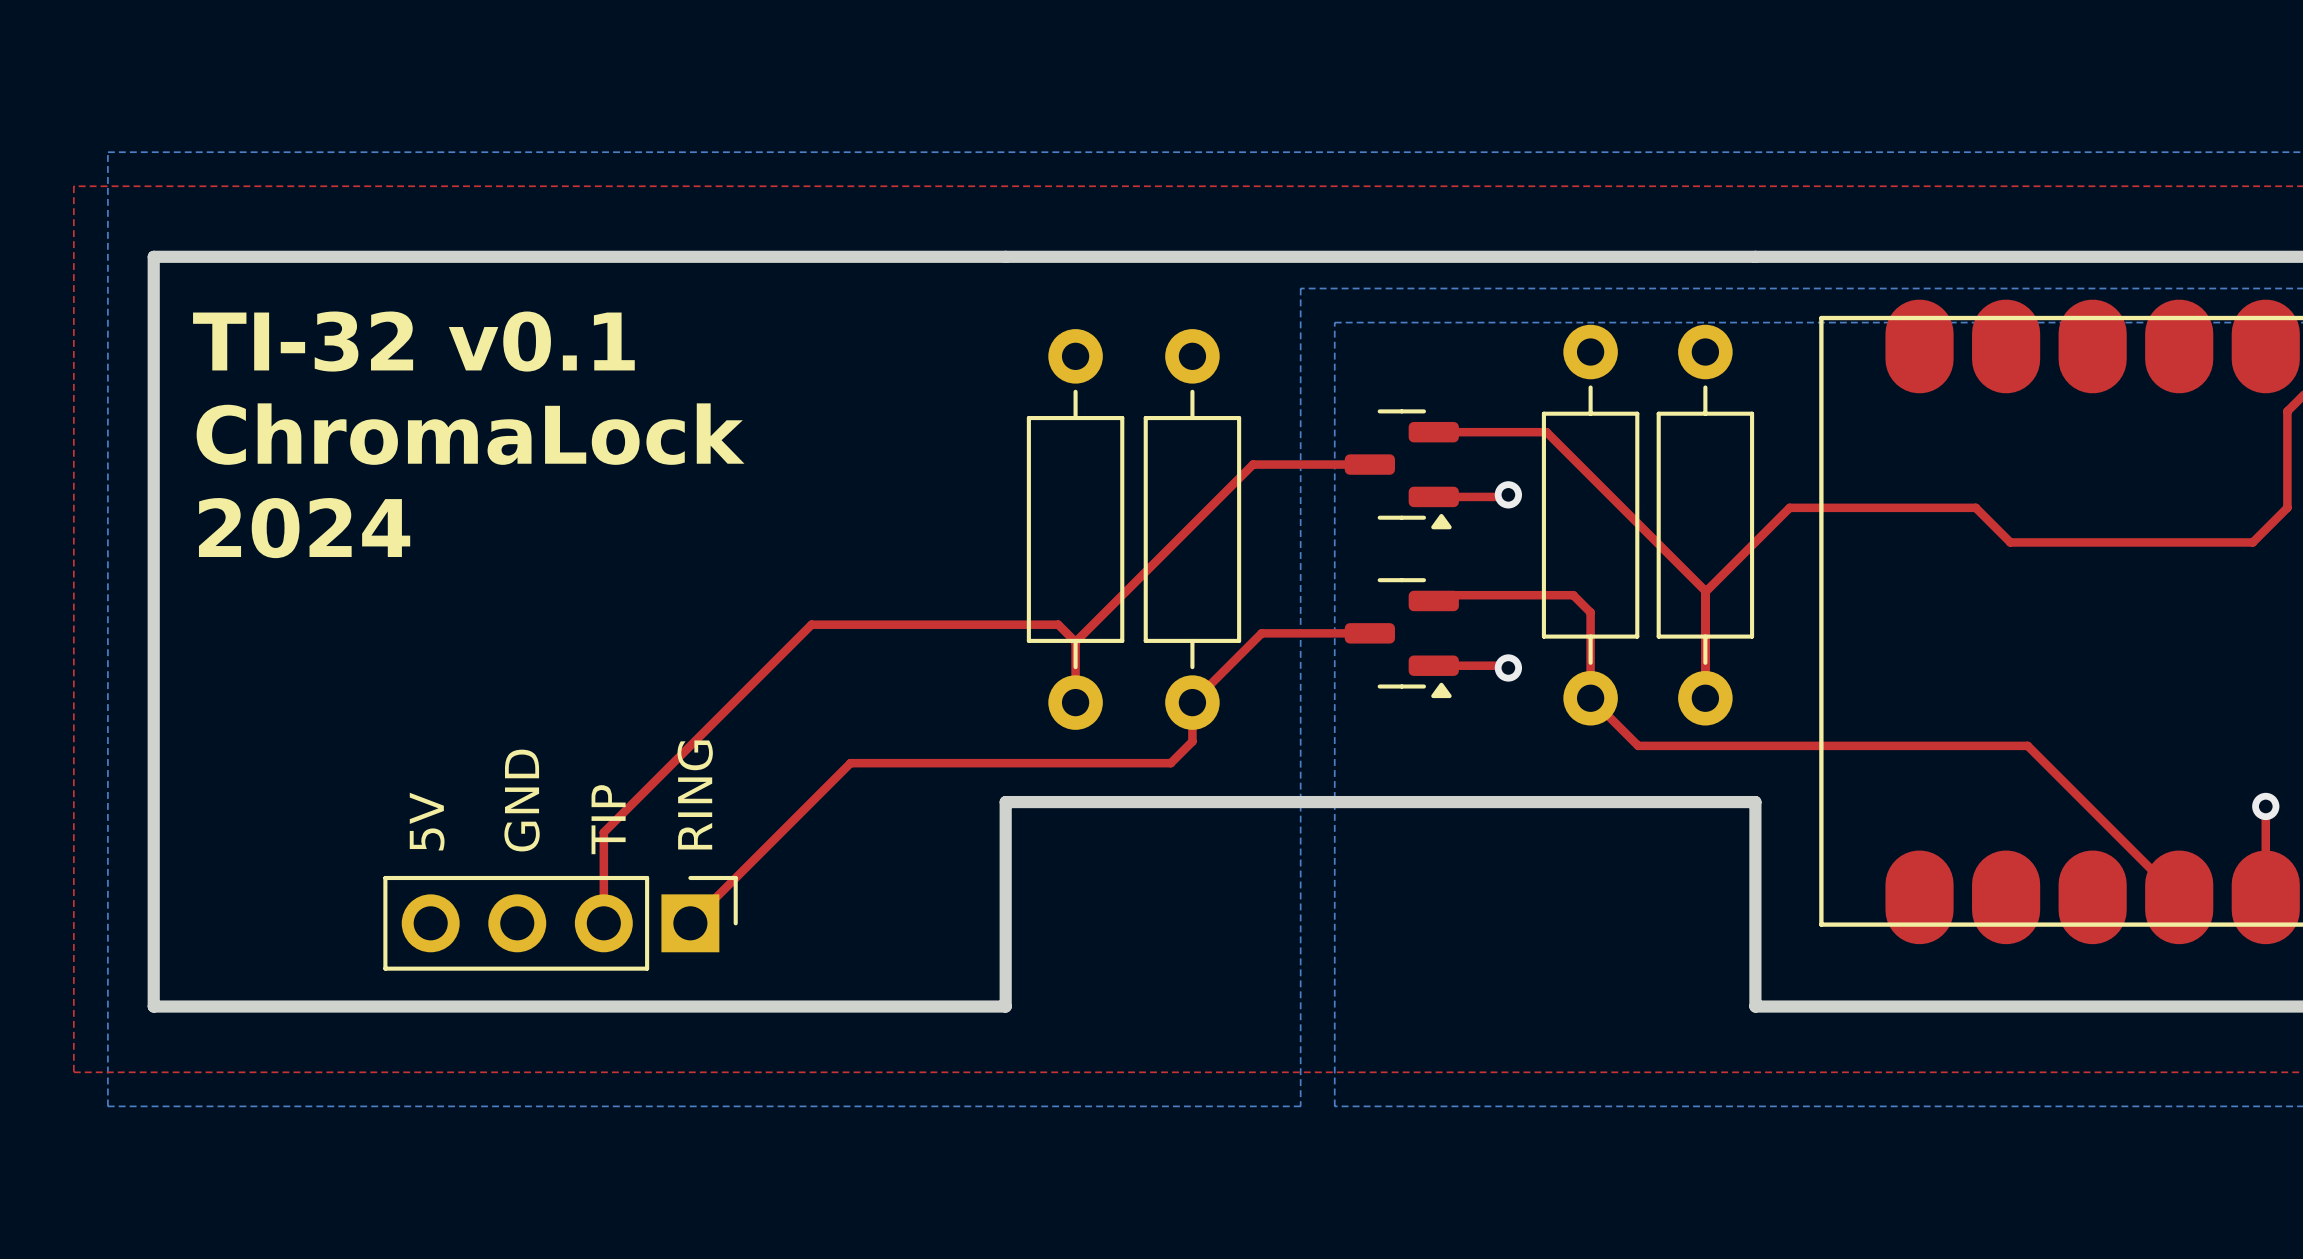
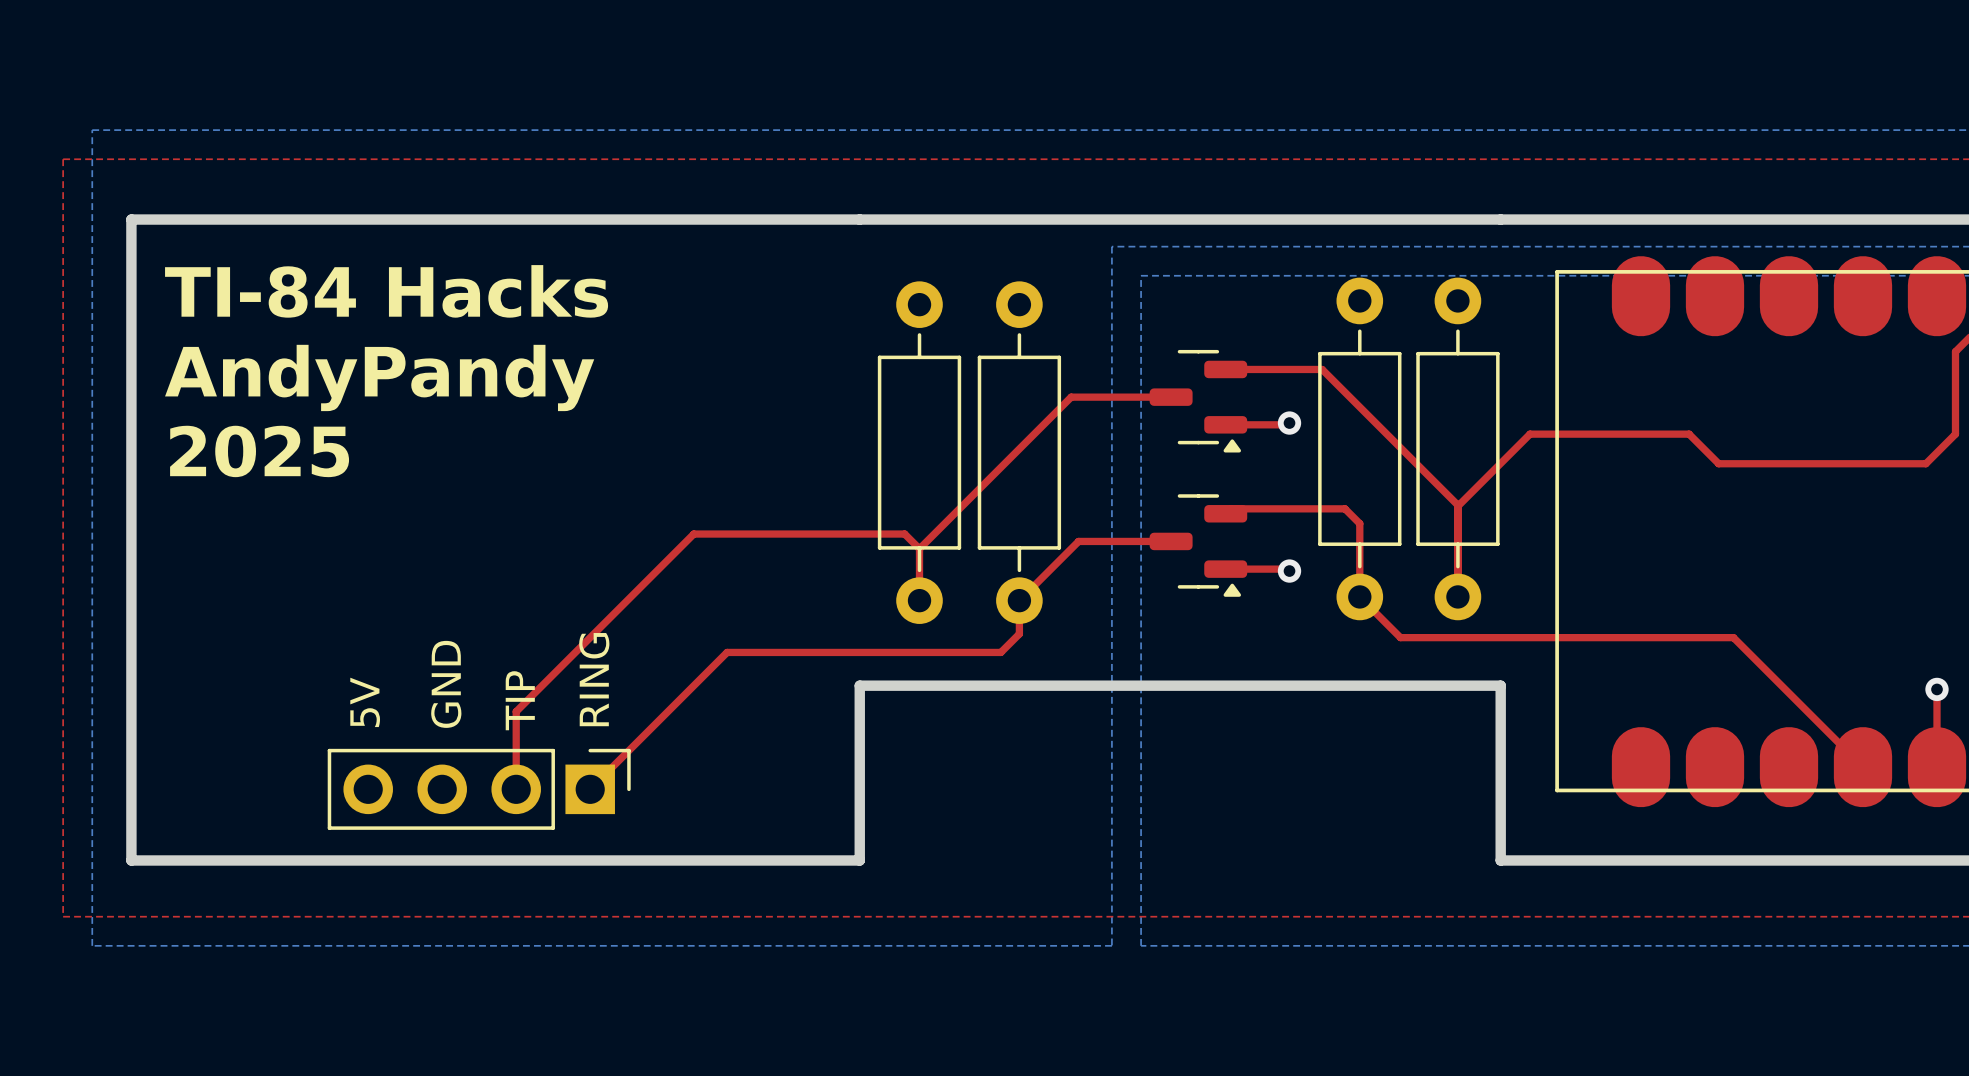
text: TI-32 v0.1 (413, 341) -> TI-84 Hacks (386, 291)
text: ChromaLock (470, 434) -> AndyPandy (379, 377)
text: 2024 (304, 528) -> 2025 (259, 451)

